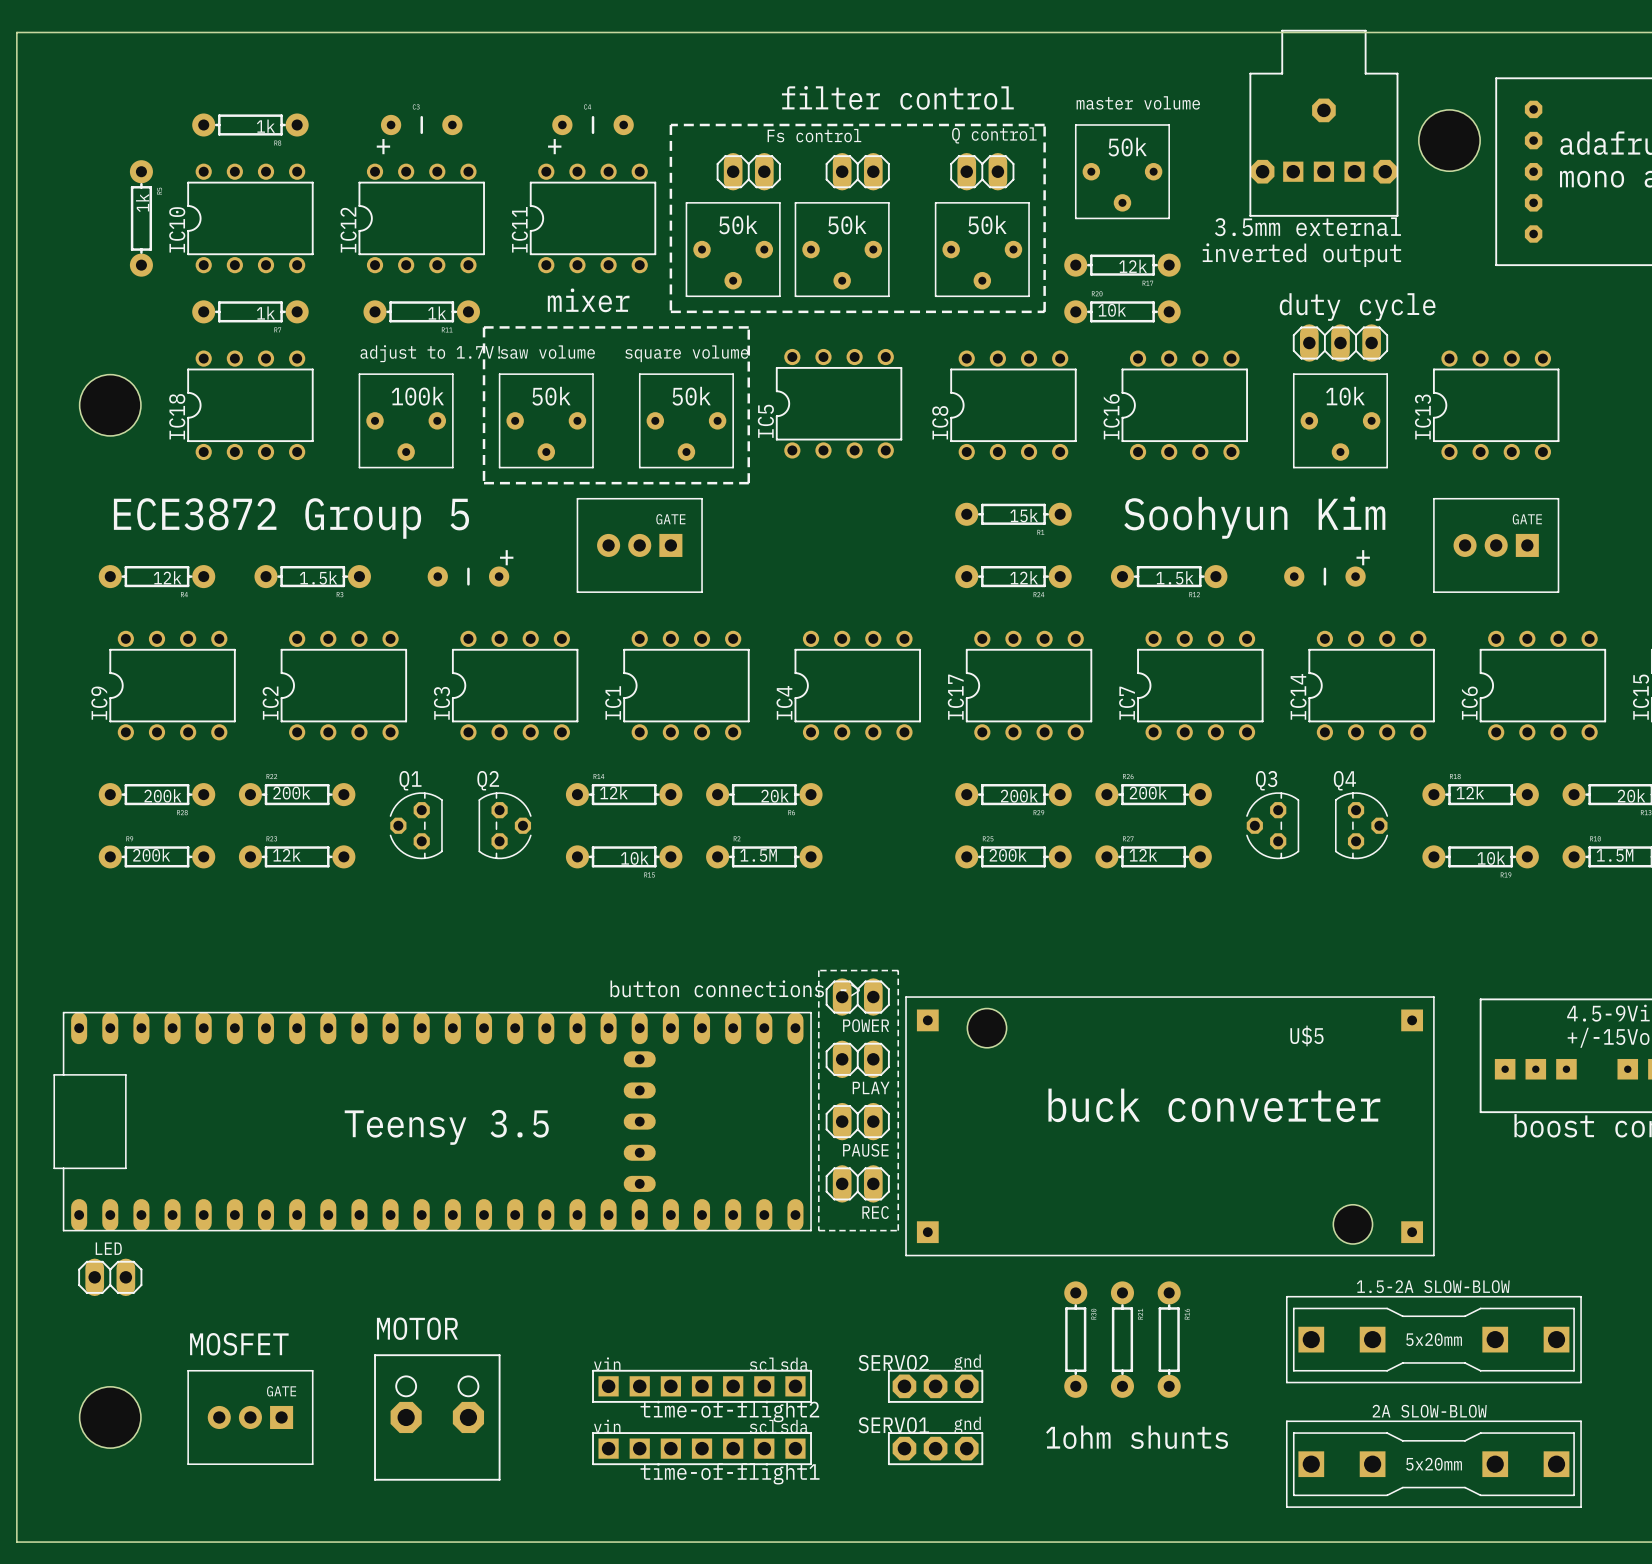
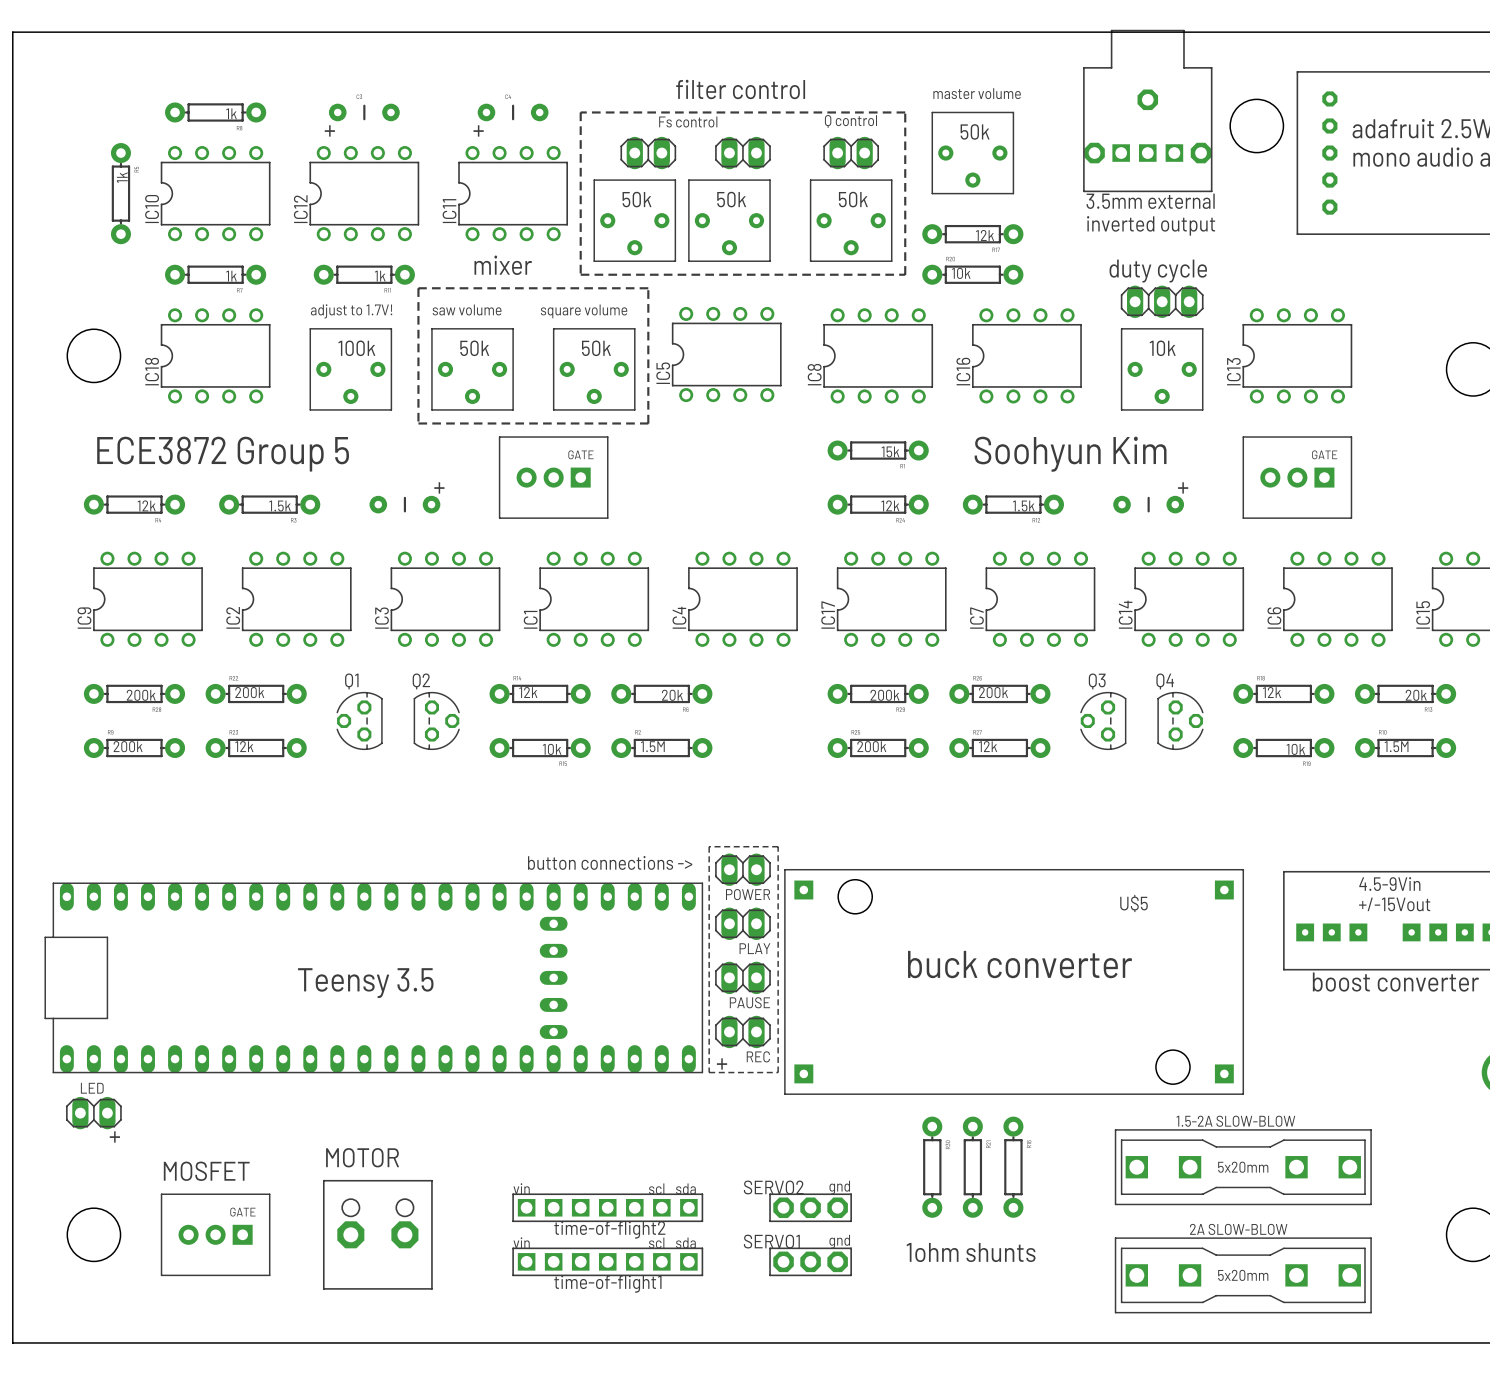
text: none -> + (722, 1063)
text: none -> + (114, 1136)

